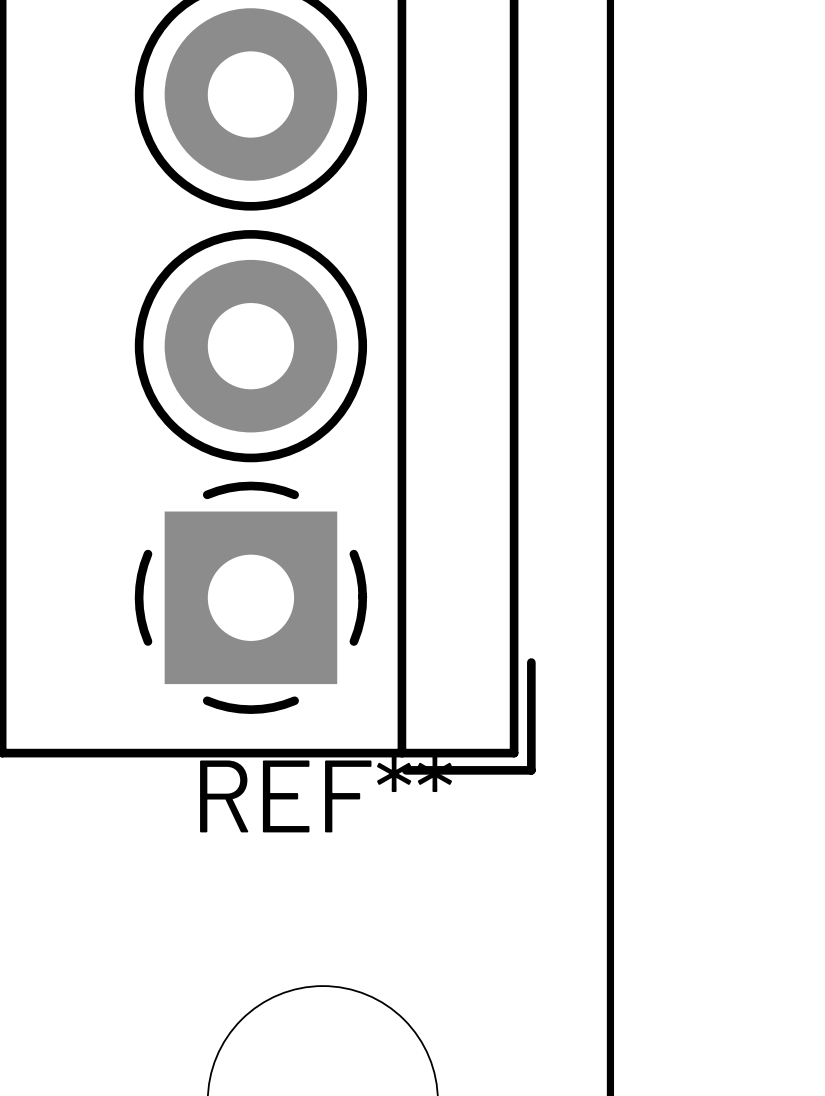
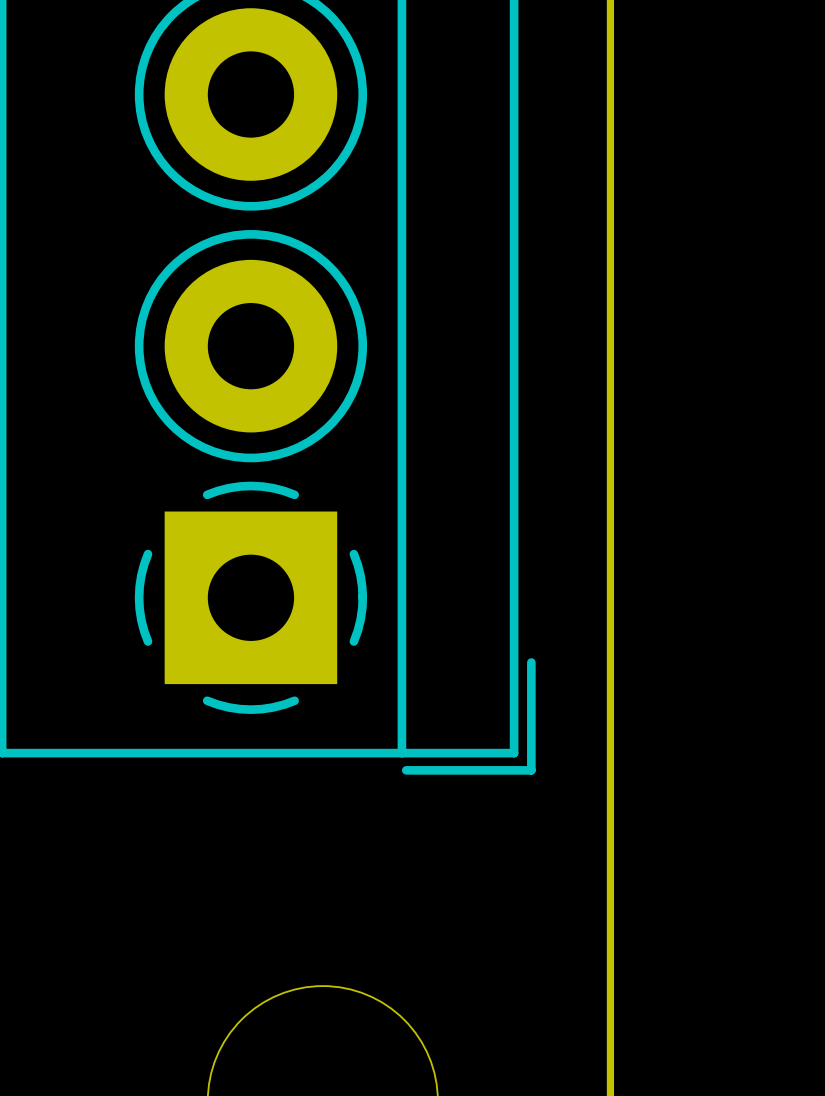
REF** name: REF** (326, 794) -> none

